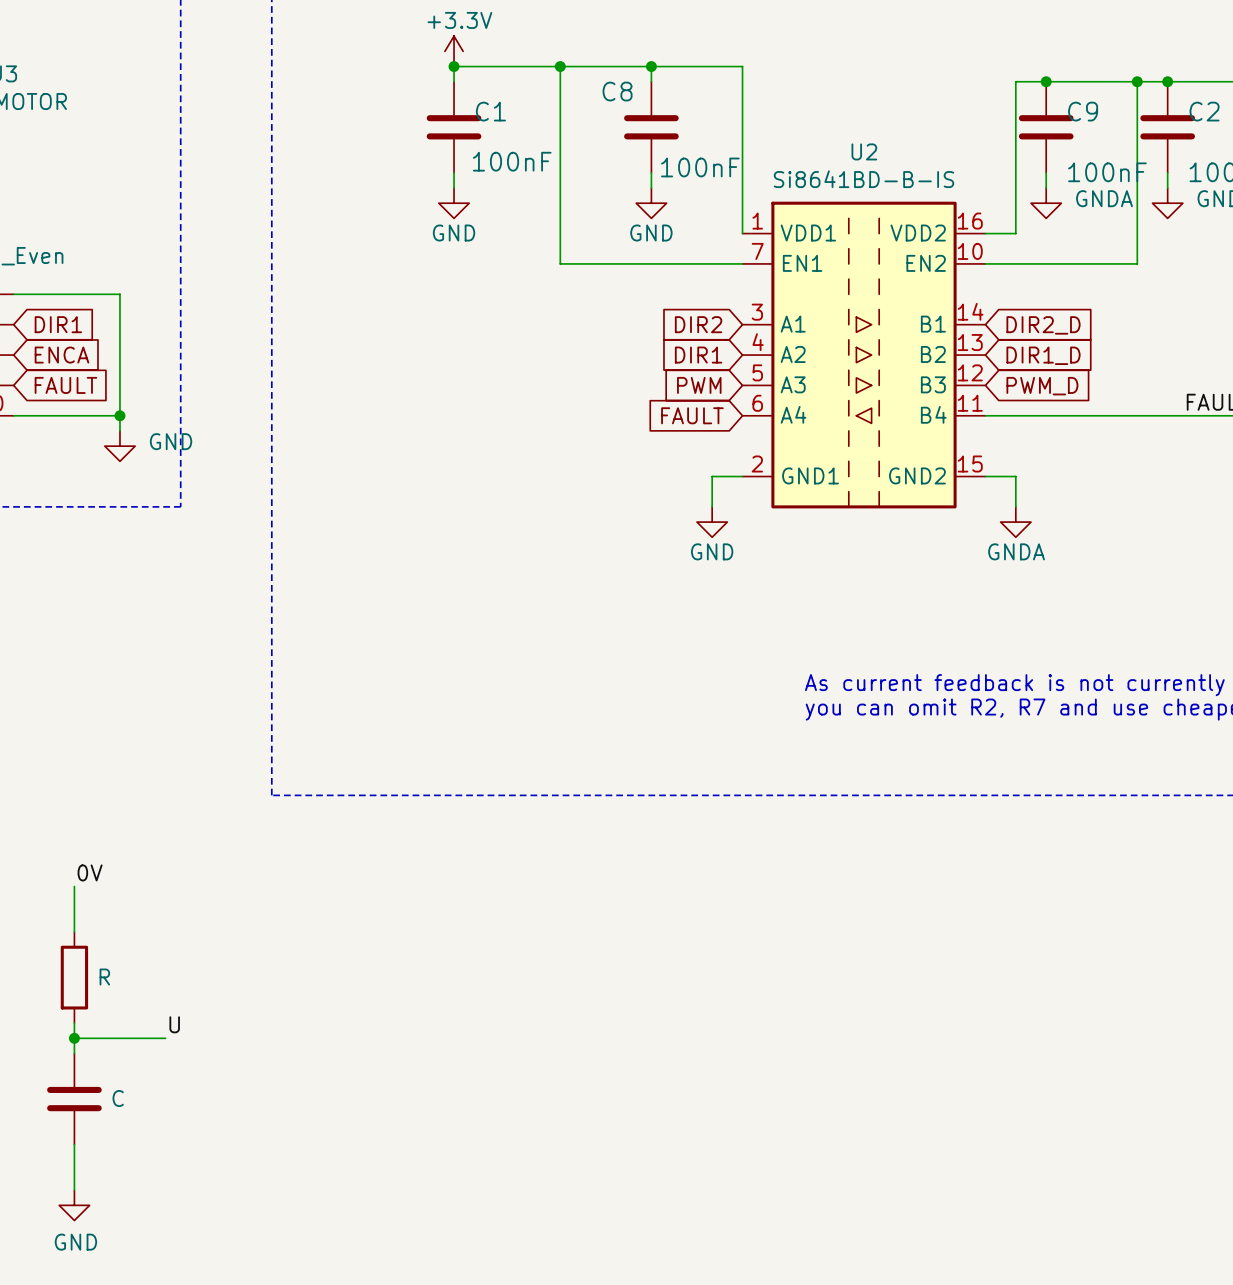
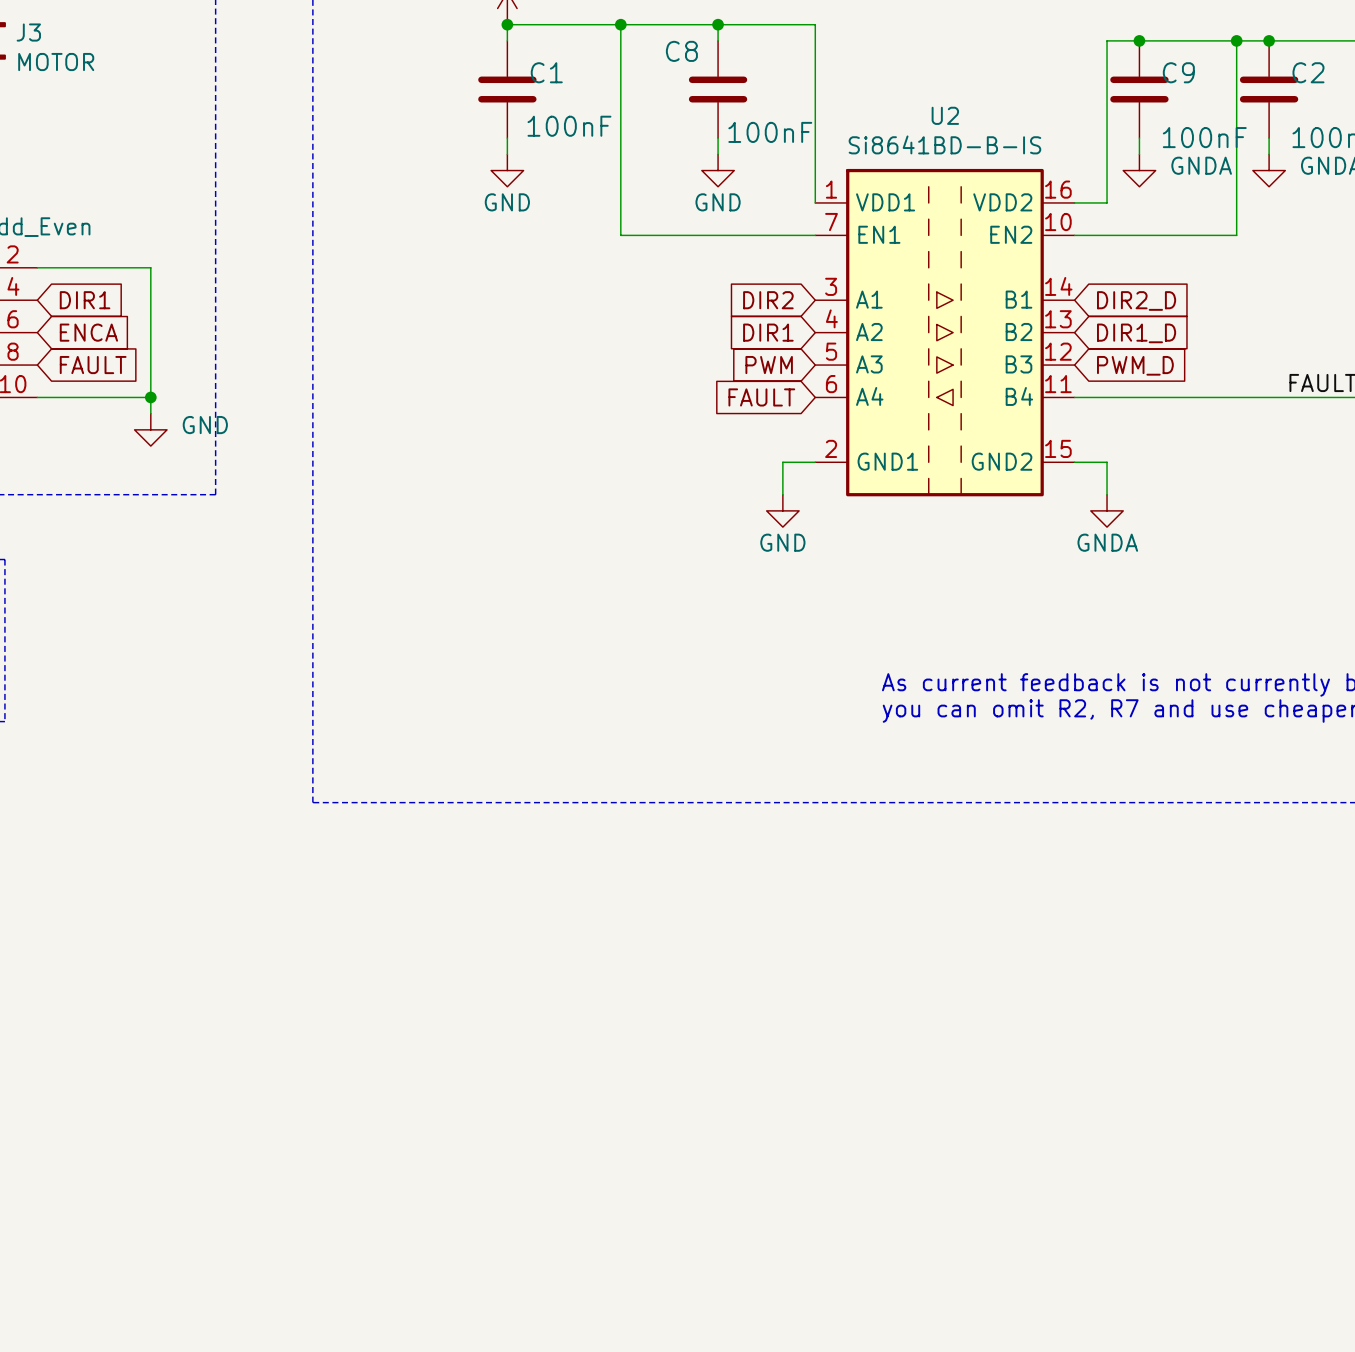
label: 0V (90, 872) -> none
wire: (74, 886) (74, 932) -> none
part: R (74, 977) -> none
wire: (74, 1023) (74, 1053) -> none
label: U (174, 1024) -> none
wire: (74, 1038) (165, 1038) -> none
junction: (74, 1038) -> none
part: C (74, 1099) -> none
wire: (74, 1144) (74, 1190) -> none
power symbol: GND (74, 1205) -> none

